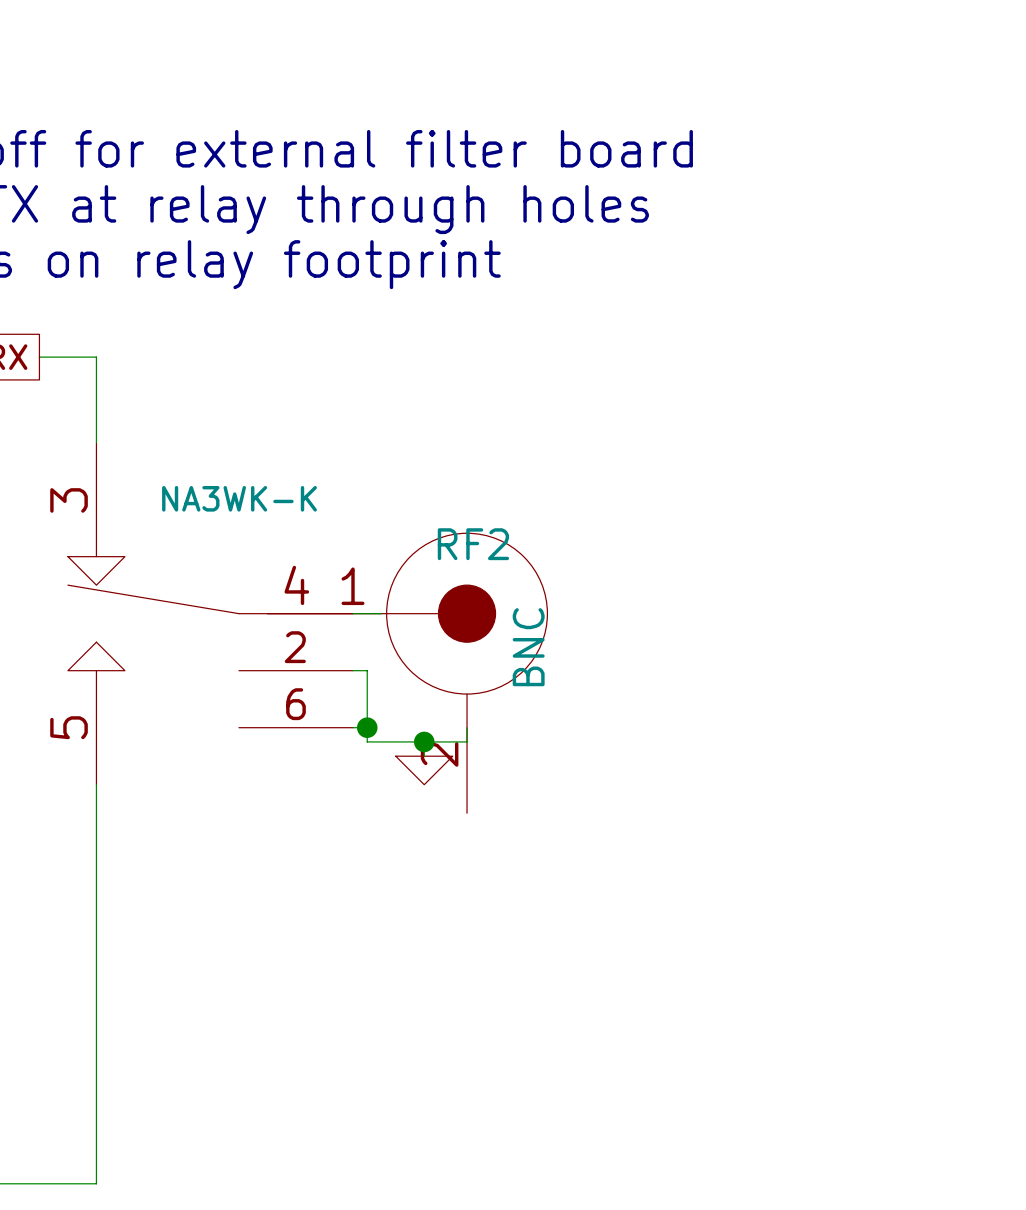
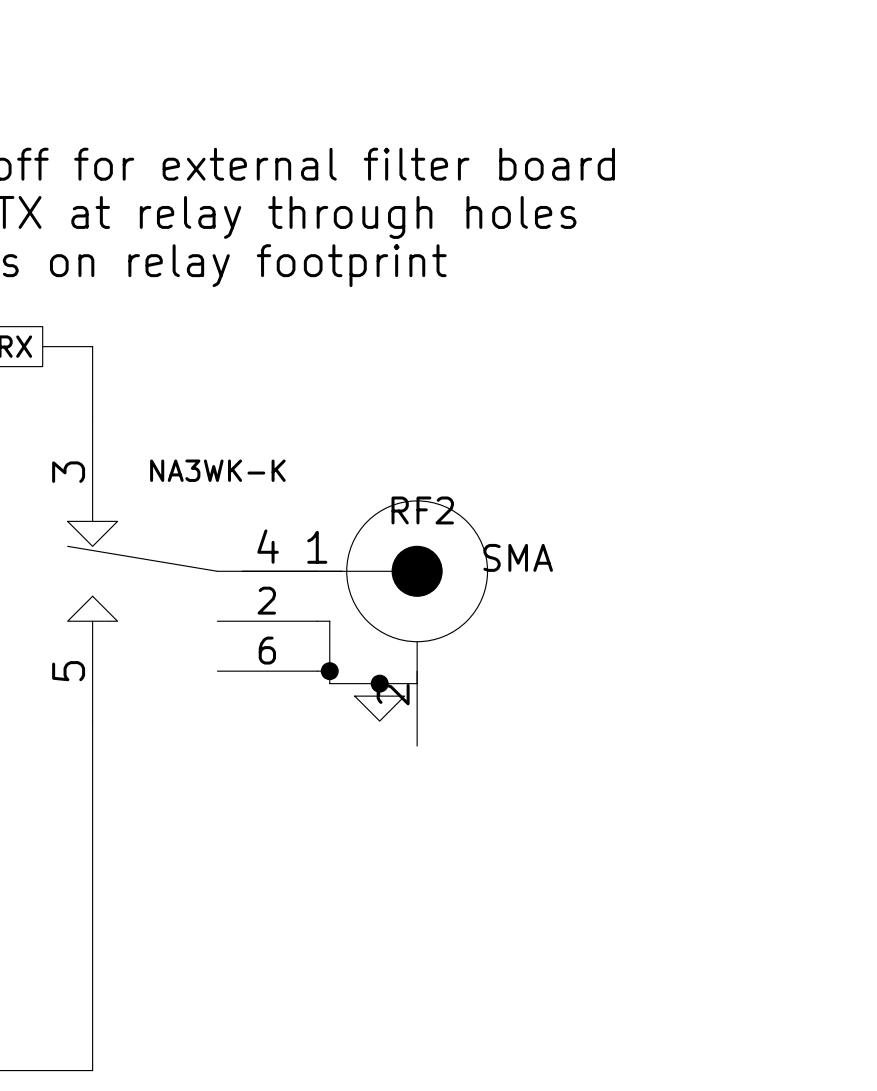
RF2 value: BNC (528, 647) -> SMA (518, 557)

